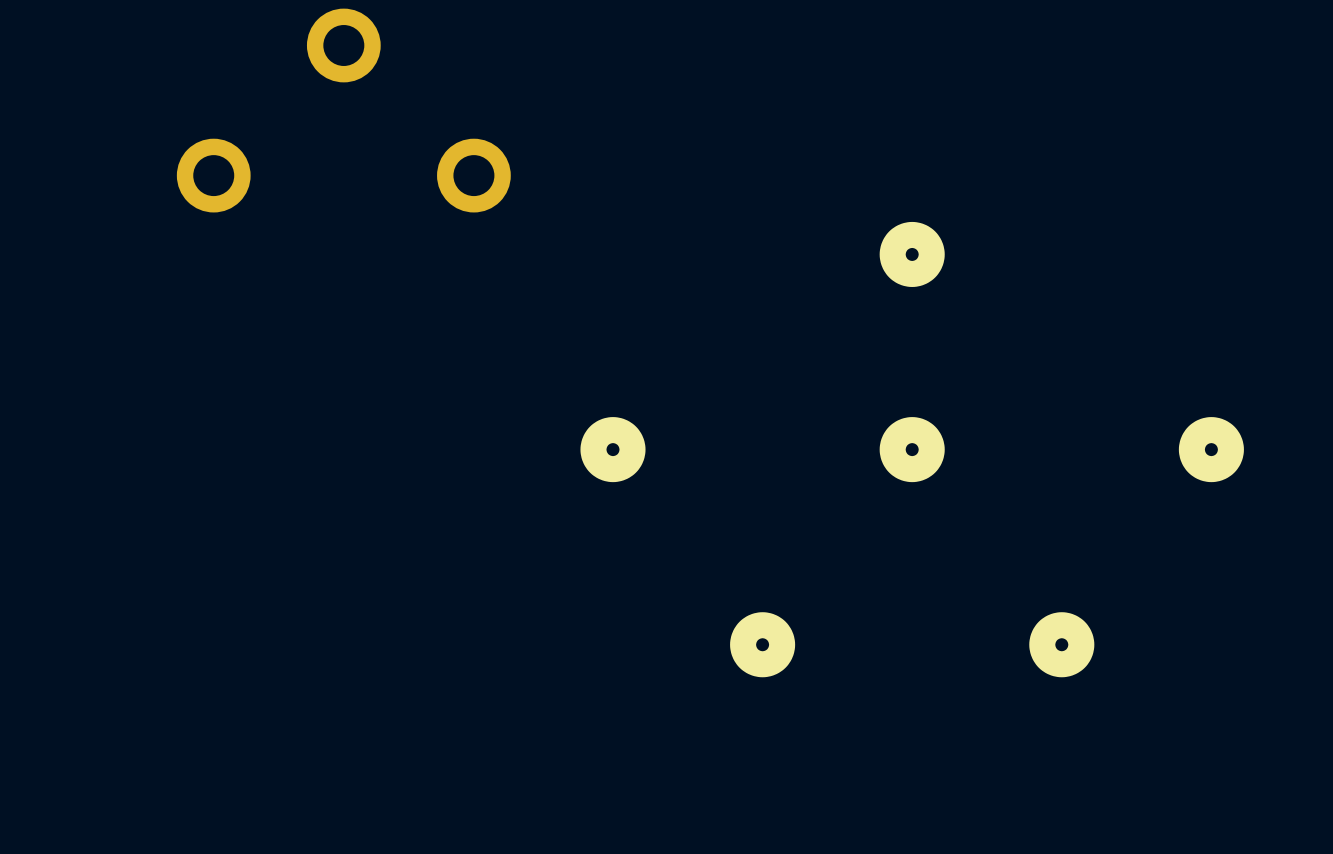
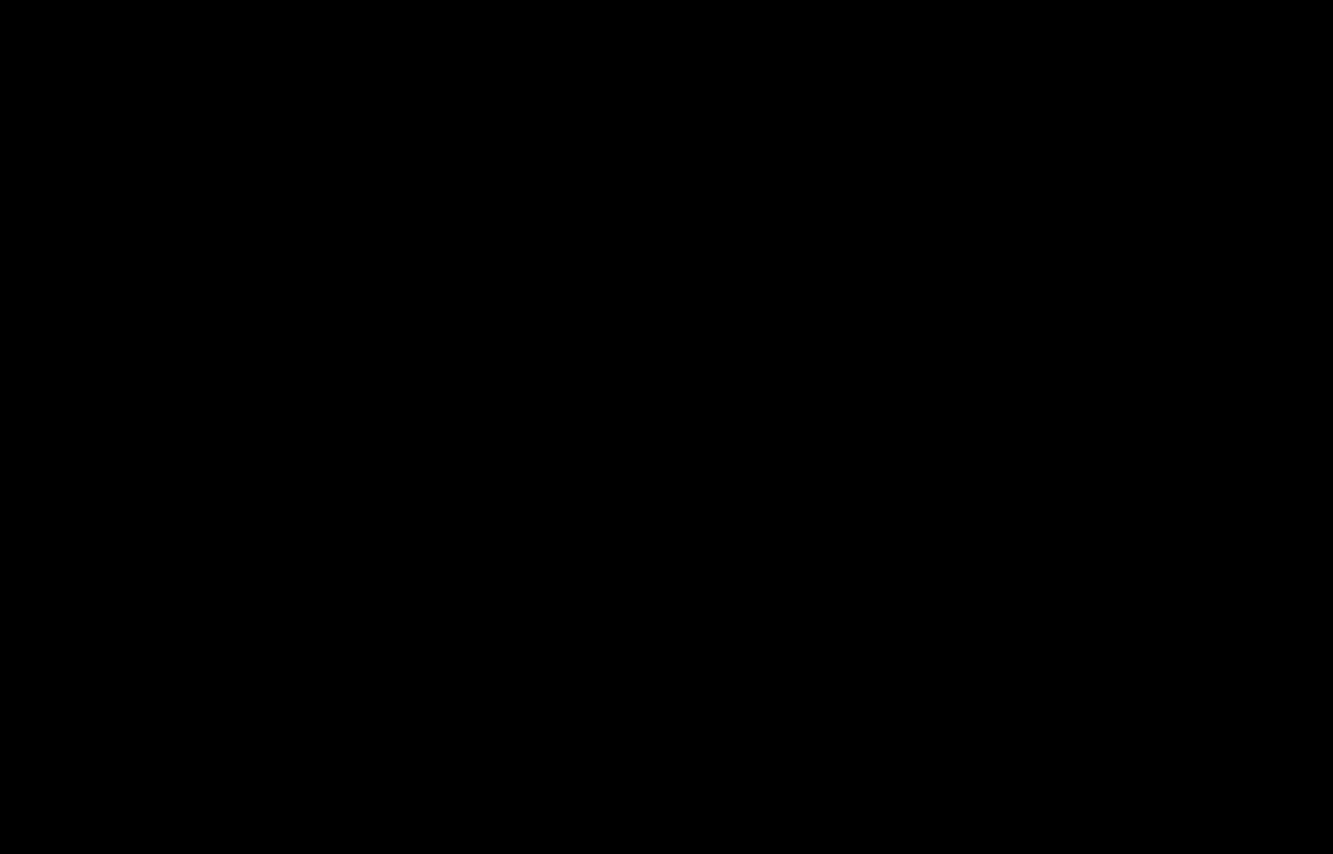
part: (343, 110) -> none
part: (912, 254) -> none
part: (612, 449) -> none
part: (912, 449) -> none
part: (1211, 449) -> none
part: (762, 644) -> none
part: (1061, 644) -> none

